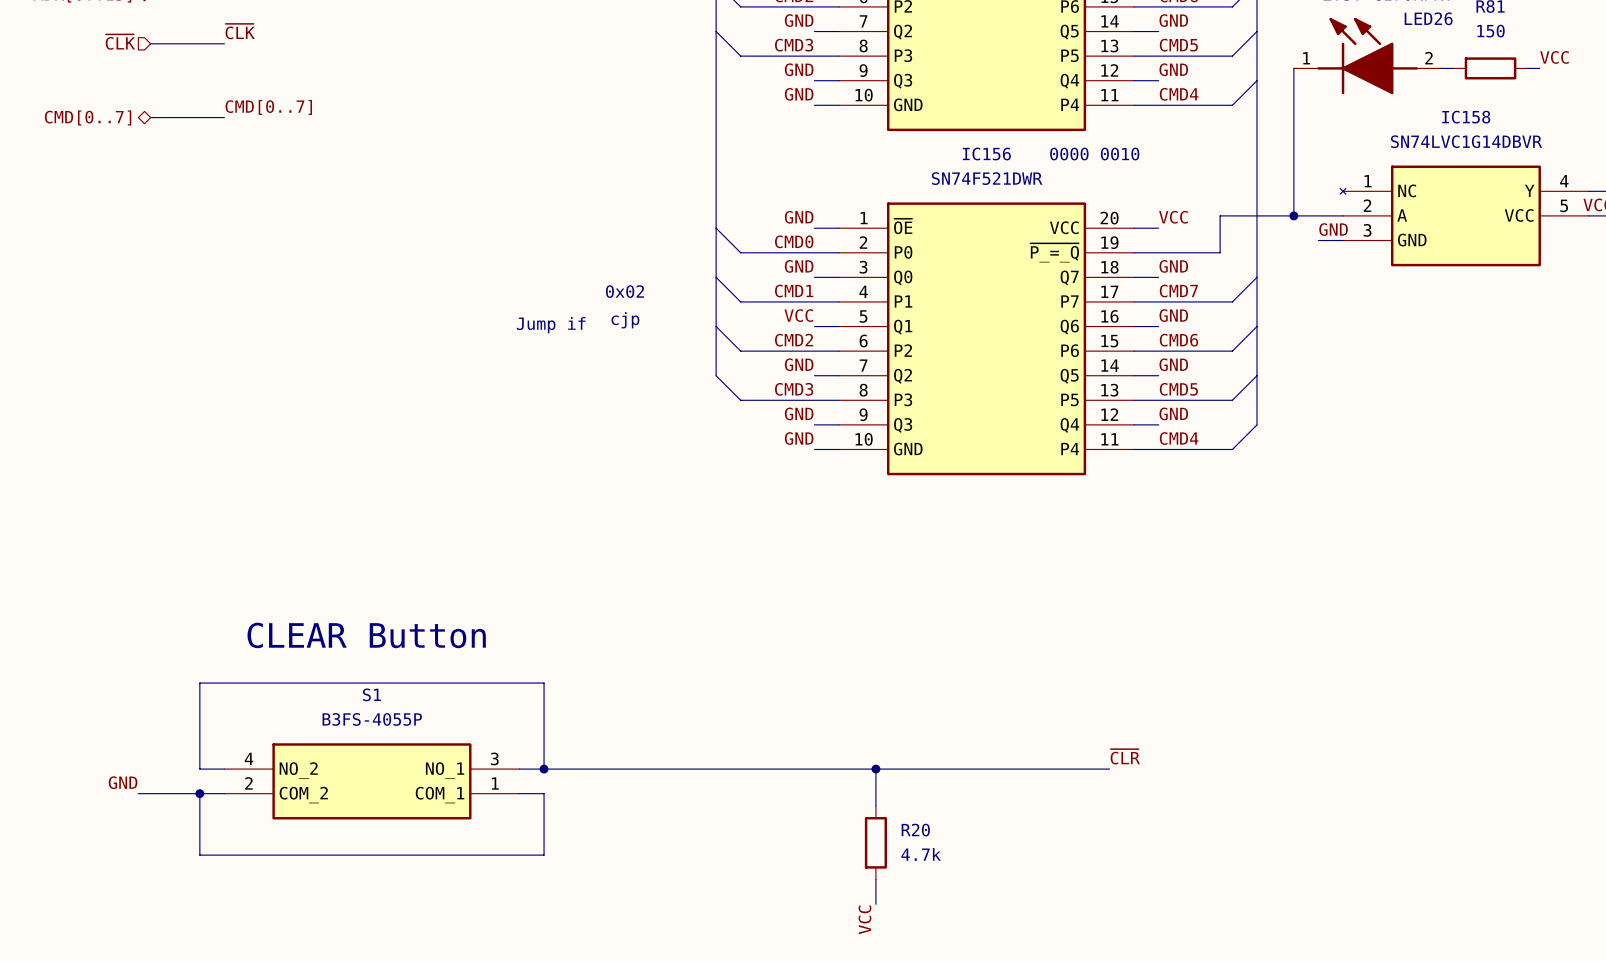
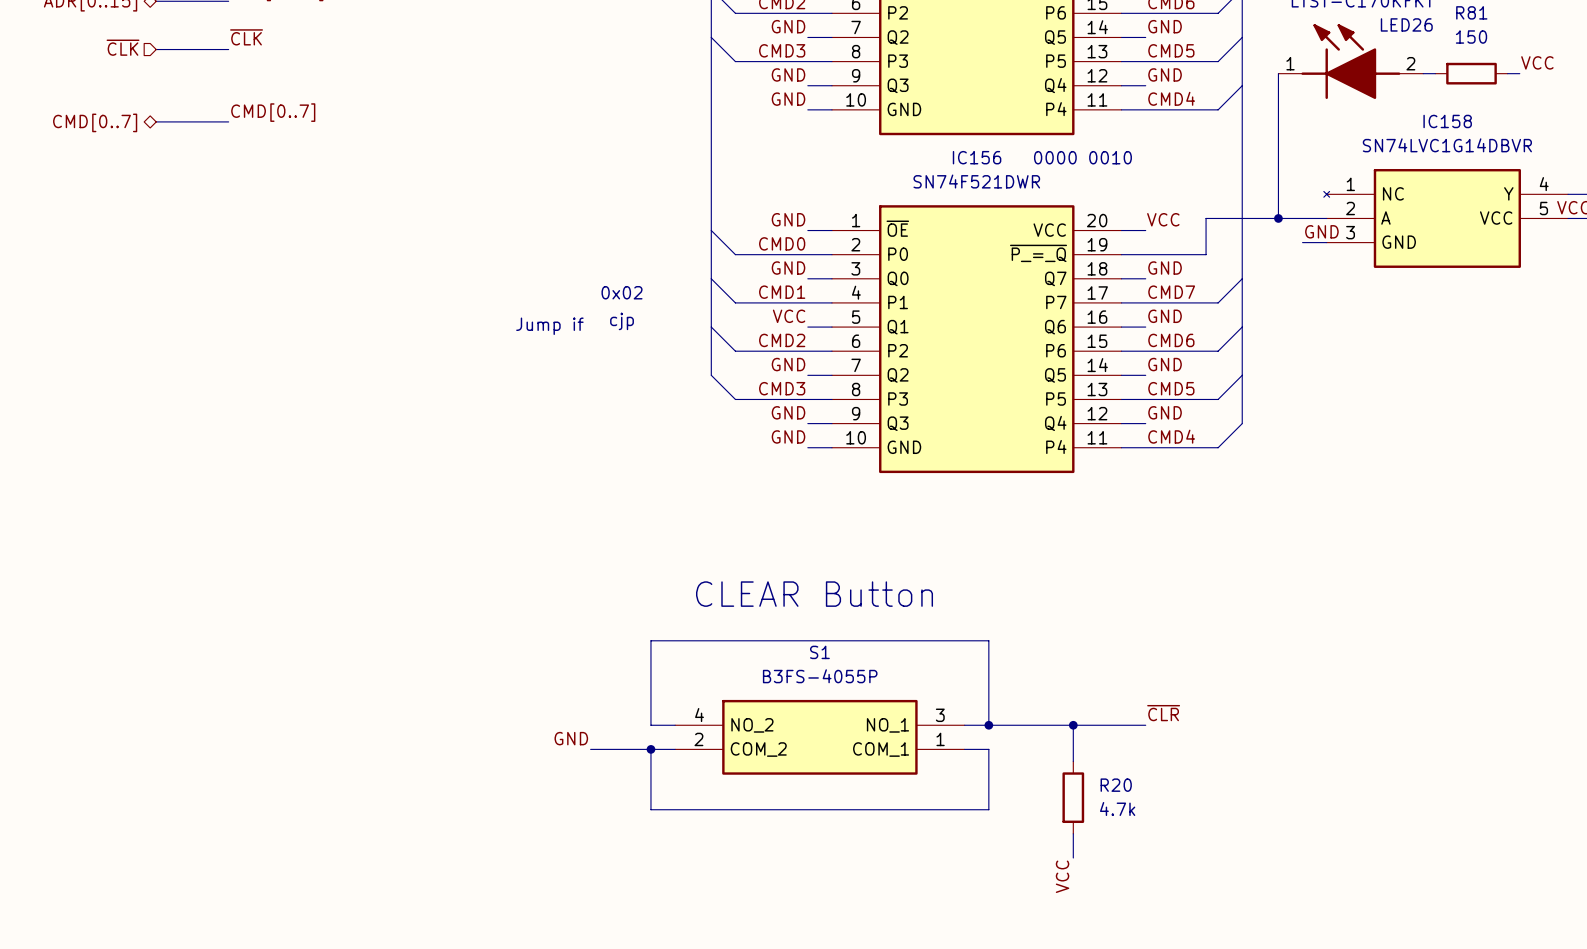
text: none -> CLEAR Button (814, 594)
text: CLEAR Button (366, 635) -> none
wire: none -> (675, 725) (650, 725) (650, 640) (988, 640) (988, 725)
wire: none -> (964, 725) (1145, 725)
junction: none -> (988, 725)
junction: none -> (1073, 725)
label: none -> GND (571, 738)
wire: none -> (590, 749) (675, 749)
wire: none -> (650, 749) (650, 809) (988, 809) (988, 749) (964, 749)
junction: none -> (650, 749)
label position: ~{CLR} (1125, 756) -> ~{CLR} (1163, 713)
wire: (224, 769) (199, 769) (199, 683) (544, 683) (544, 769) -> none
wire: (519, 769) (1109, 769) -> none
junction: (544, 769) -> none
wire: (875, 769) (875, 805) -> (1073, 725) (1073, 761)
junction: (875, 769) -> none
S1 position: (371, 781) -> (819, 737)
label: GND (123, 782) -> none
wire: (138, 793) (224, 793) -> none
wire: (199, 793) (199, 855) (544, 855) (544, 793) (519, 793) -> none
junction: (199, 793) -> none
R20 position: (875, 842) -> (1073, 797)
wire: (875, 879) (875, 904) -> (1073, 833) (1073, 857)
label position: VCC (864, 919) -> VCC (1062, 876)

